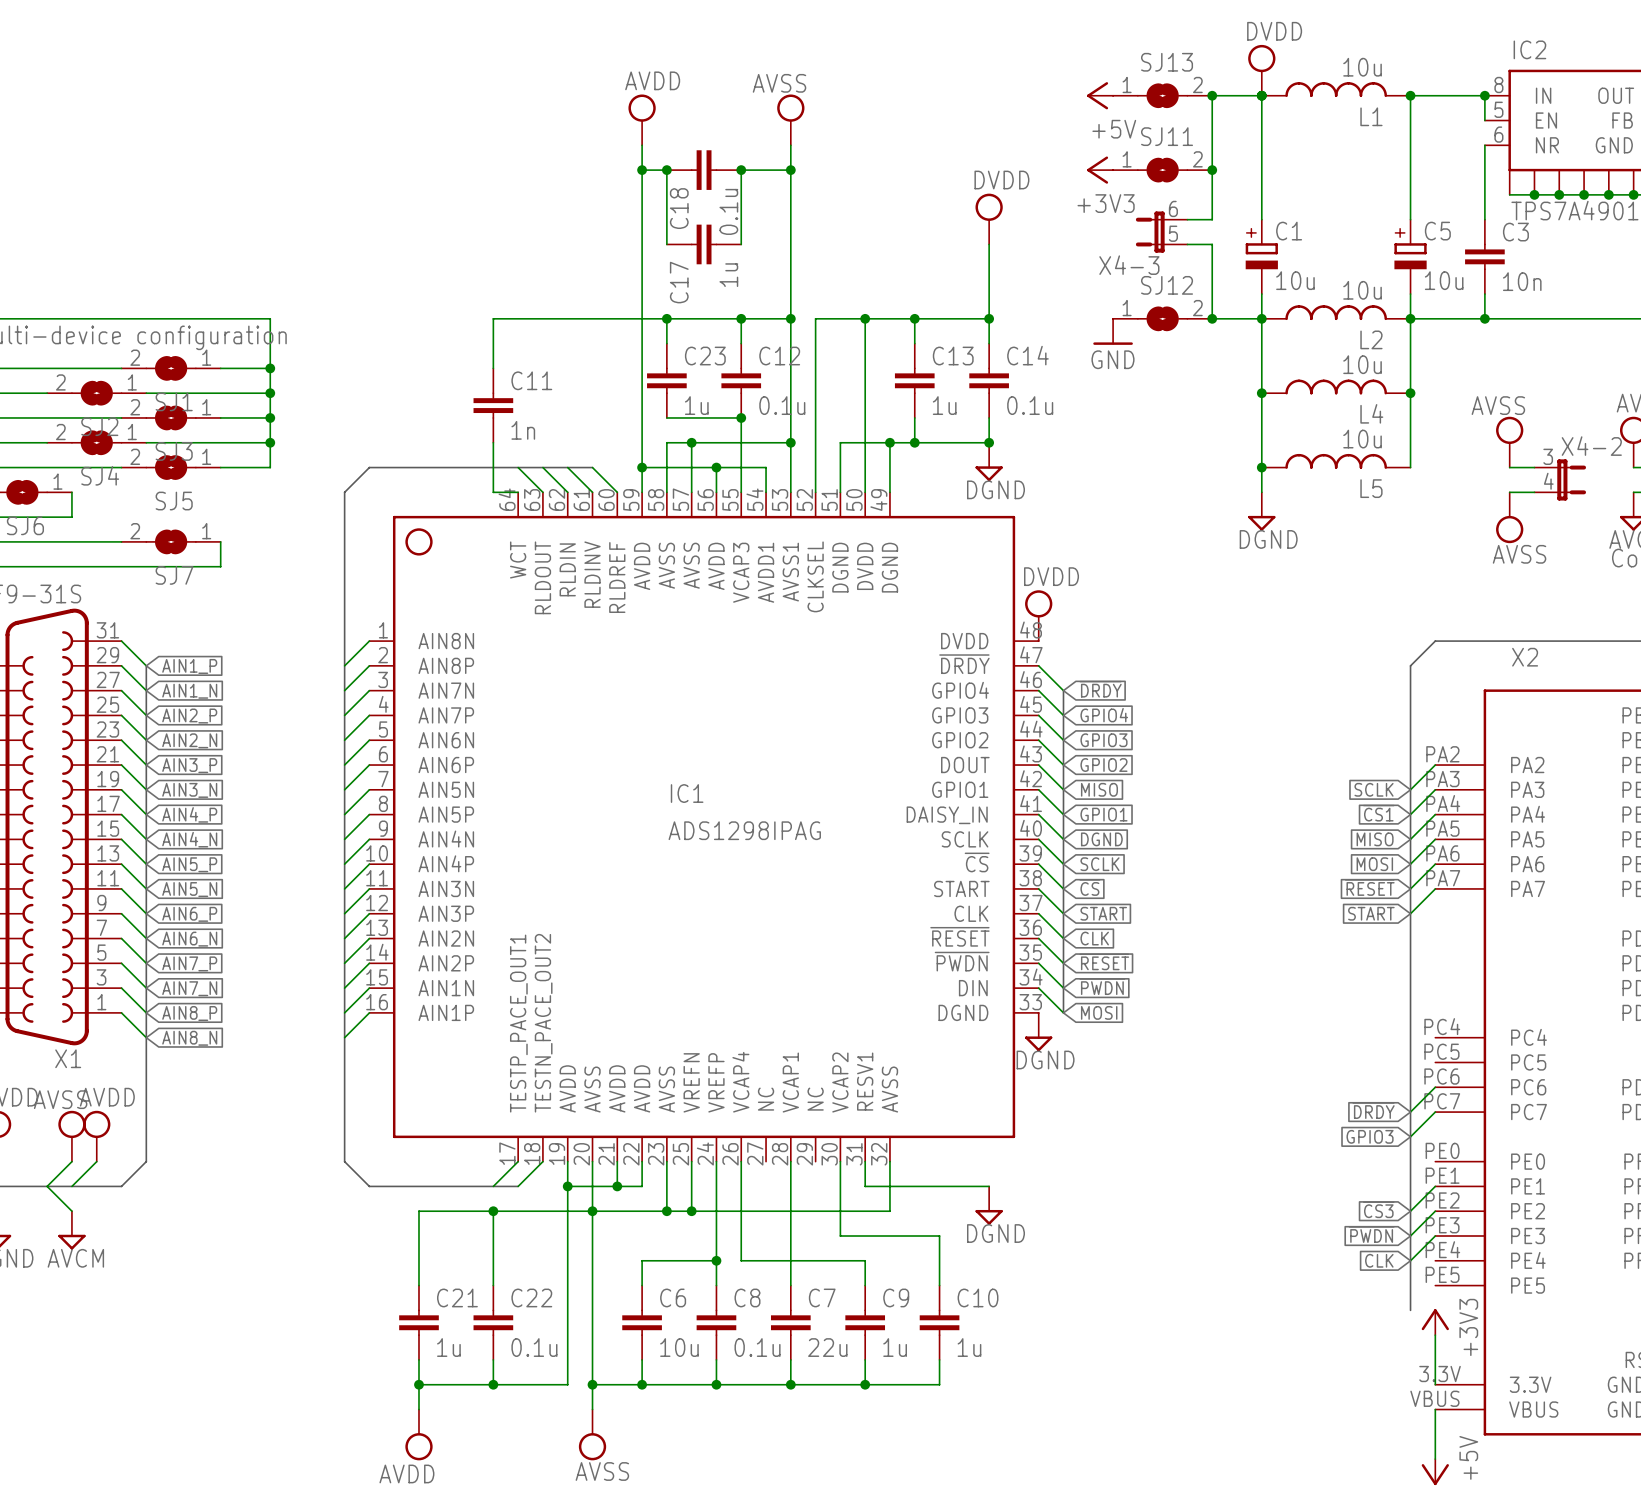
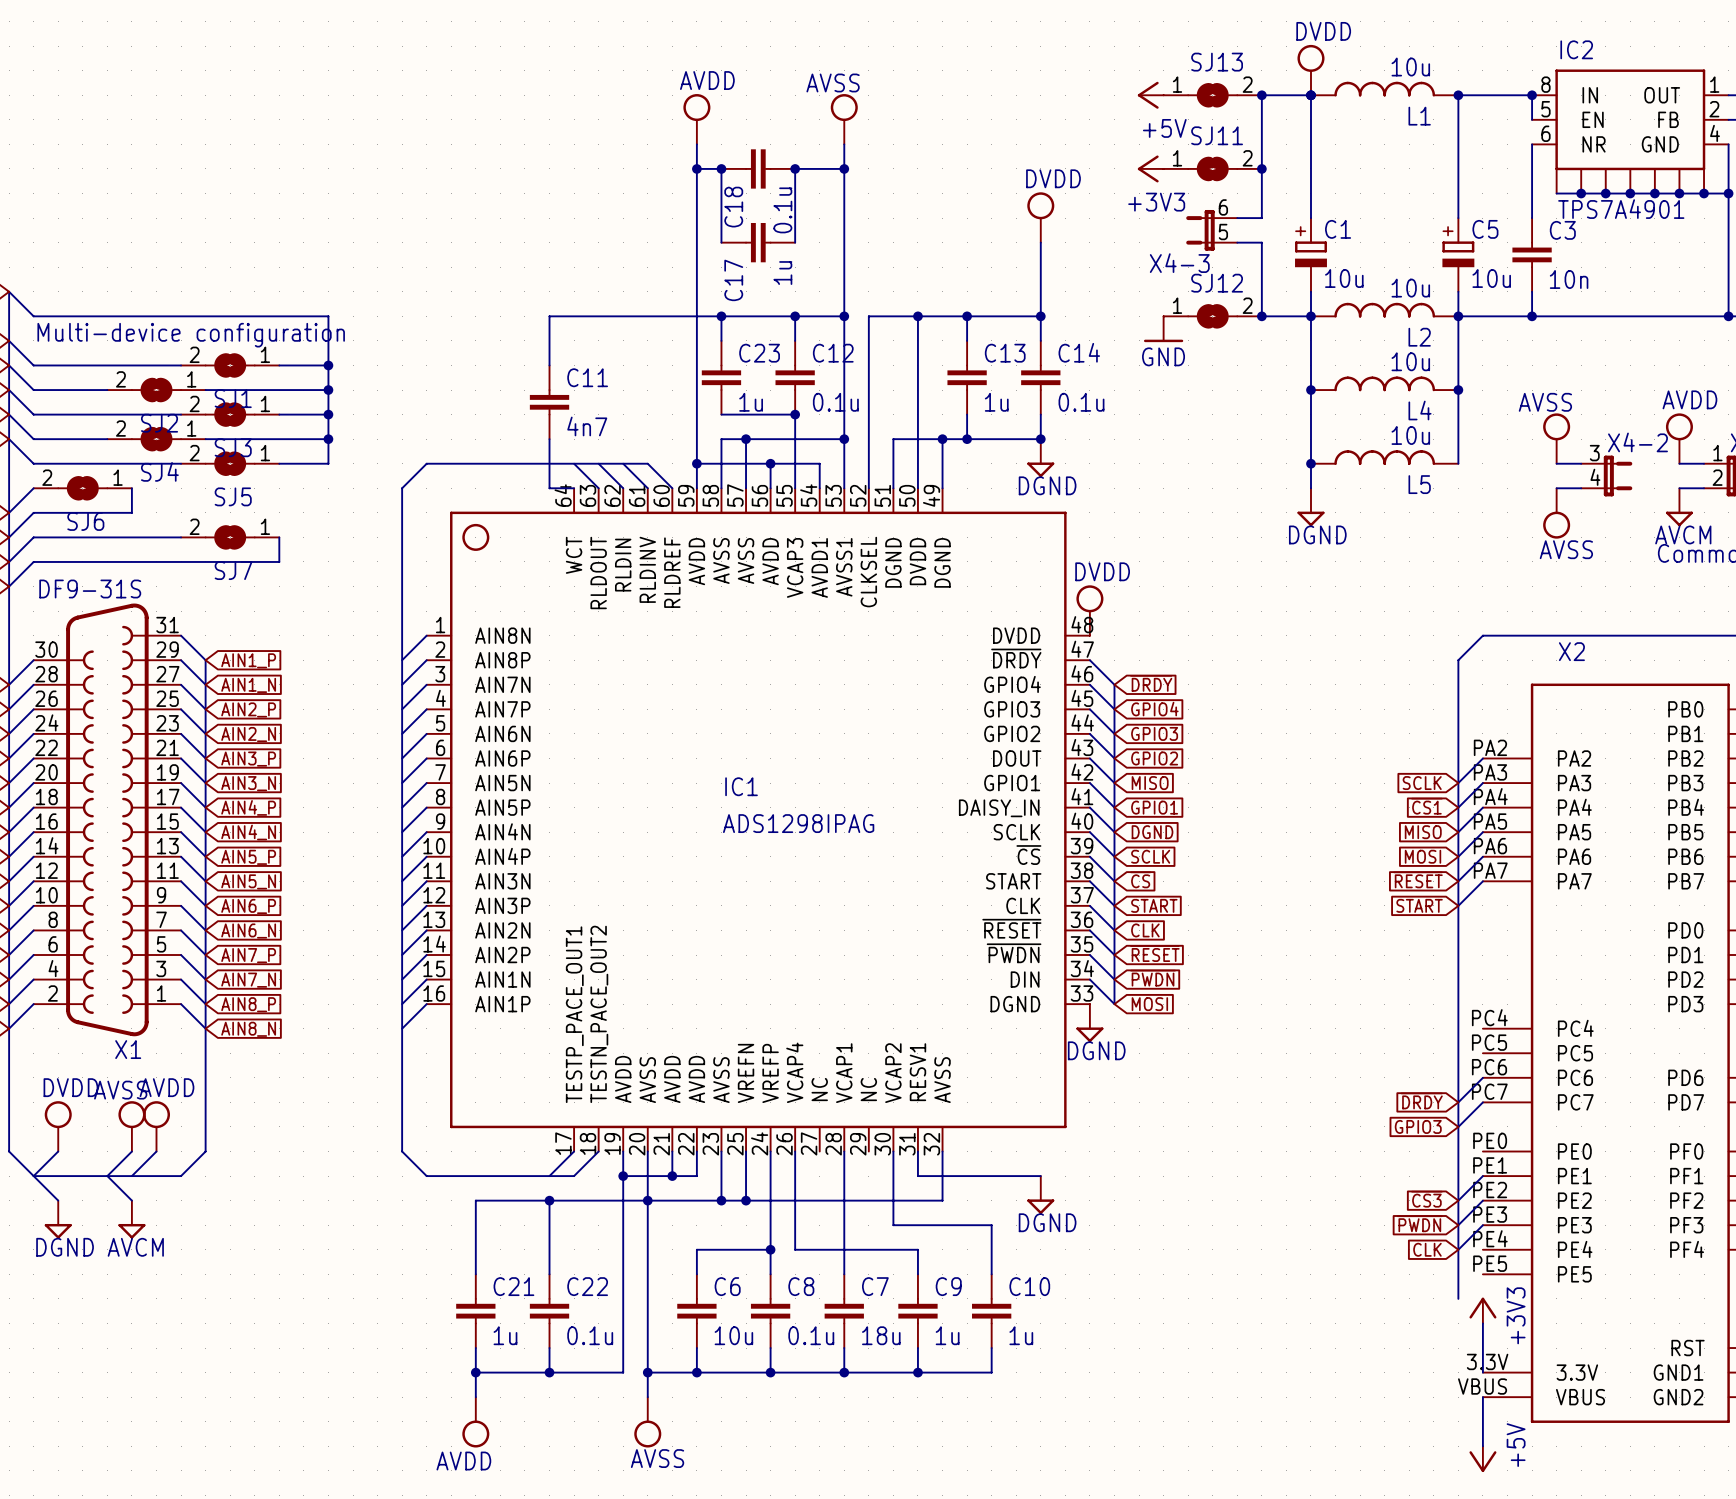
C11 value: 1n (523, 430) -> 4n7 (587, 426)
C7 value: 22u (827, 1347) -> 18u (881, 1335)

